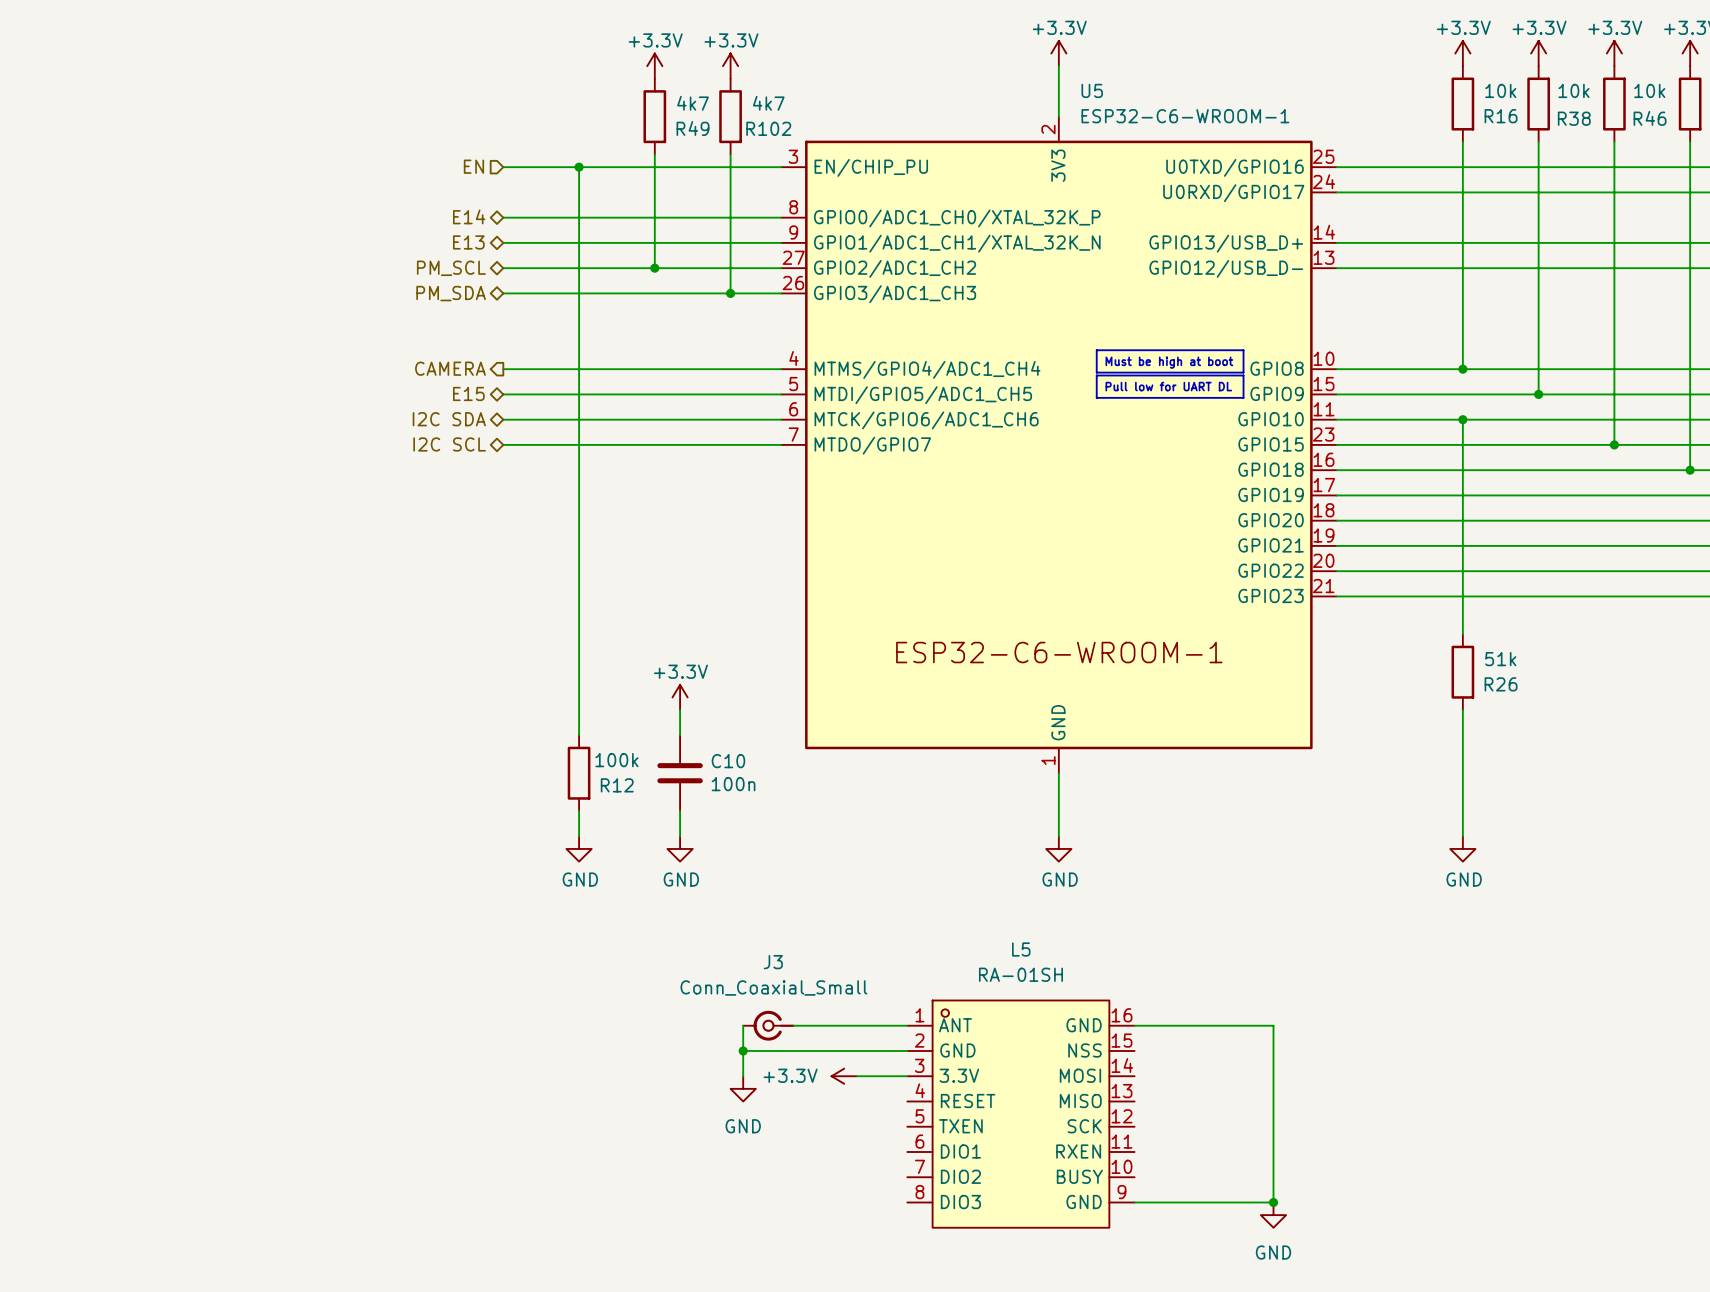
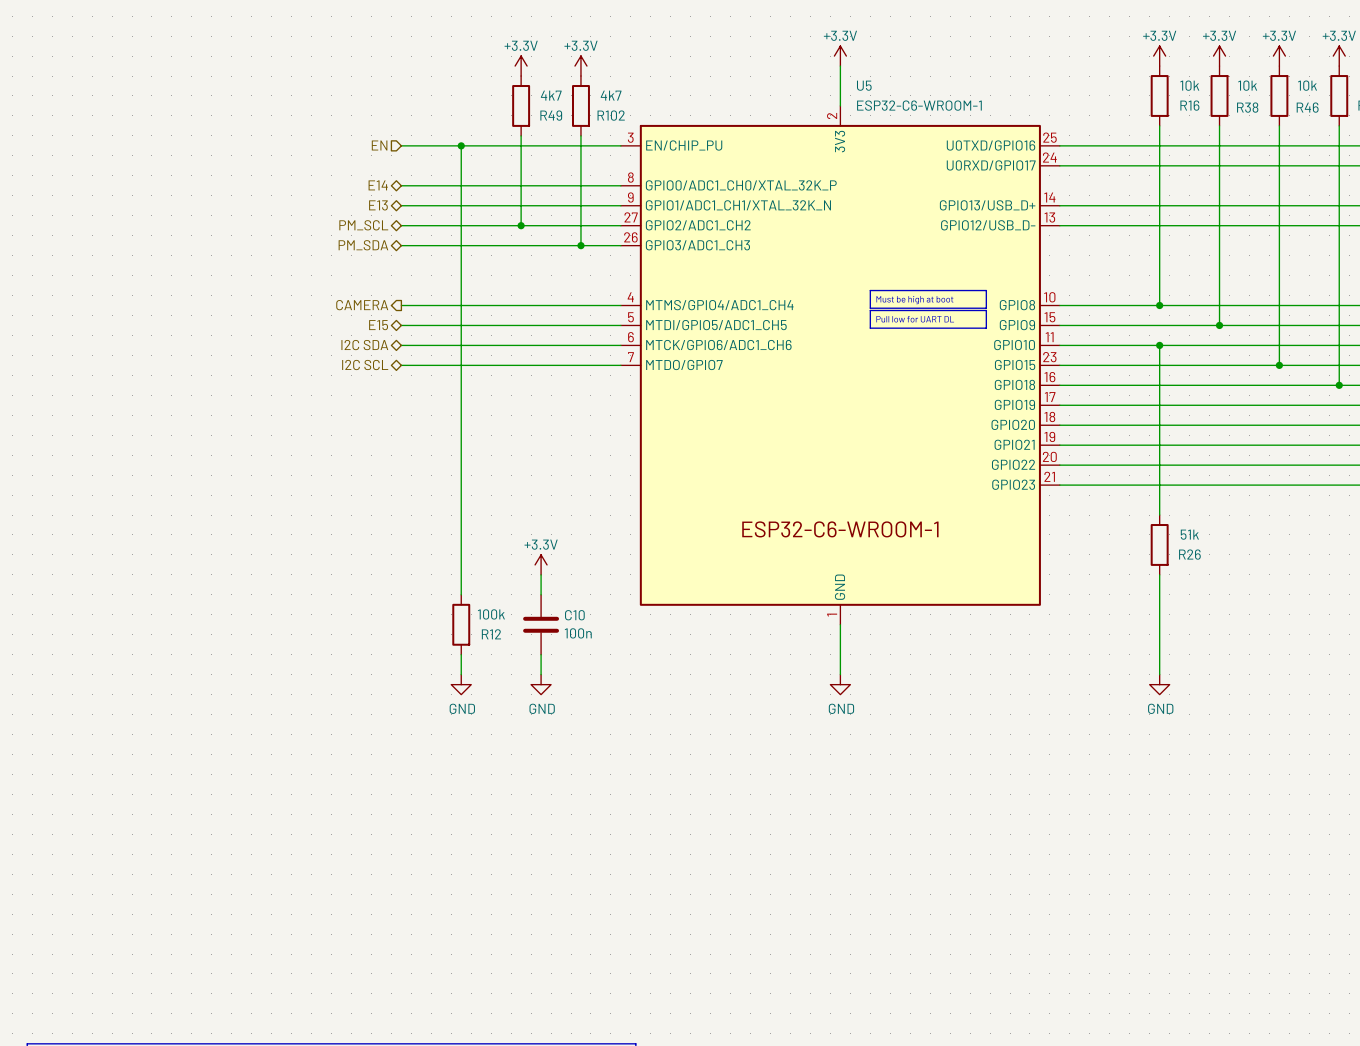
wire: (743, 1025) (743, 1076) -> none
J3: Conn_Coaxial_Small (768, 1025) -> none
wire: (793, 1025) (907, 1025) -> none
wire: (1134, 1025) (1273, 1025) (1273, 1202) (1134, 1202) -> none
wire: (743, 1050) (907, 1050) -> none
junction: (743, 1050) -> none
power symbol: +3.3V (844, 1076) -> none
wire: (856, 1076) (907, 1076) -> none
power symbol: GND (743, 1088) -> none
L5: RA-01SH (1020, 1114) -> none
junction: (1273, 1202) -> none
power symbol: GND (1273, 1215) -> none

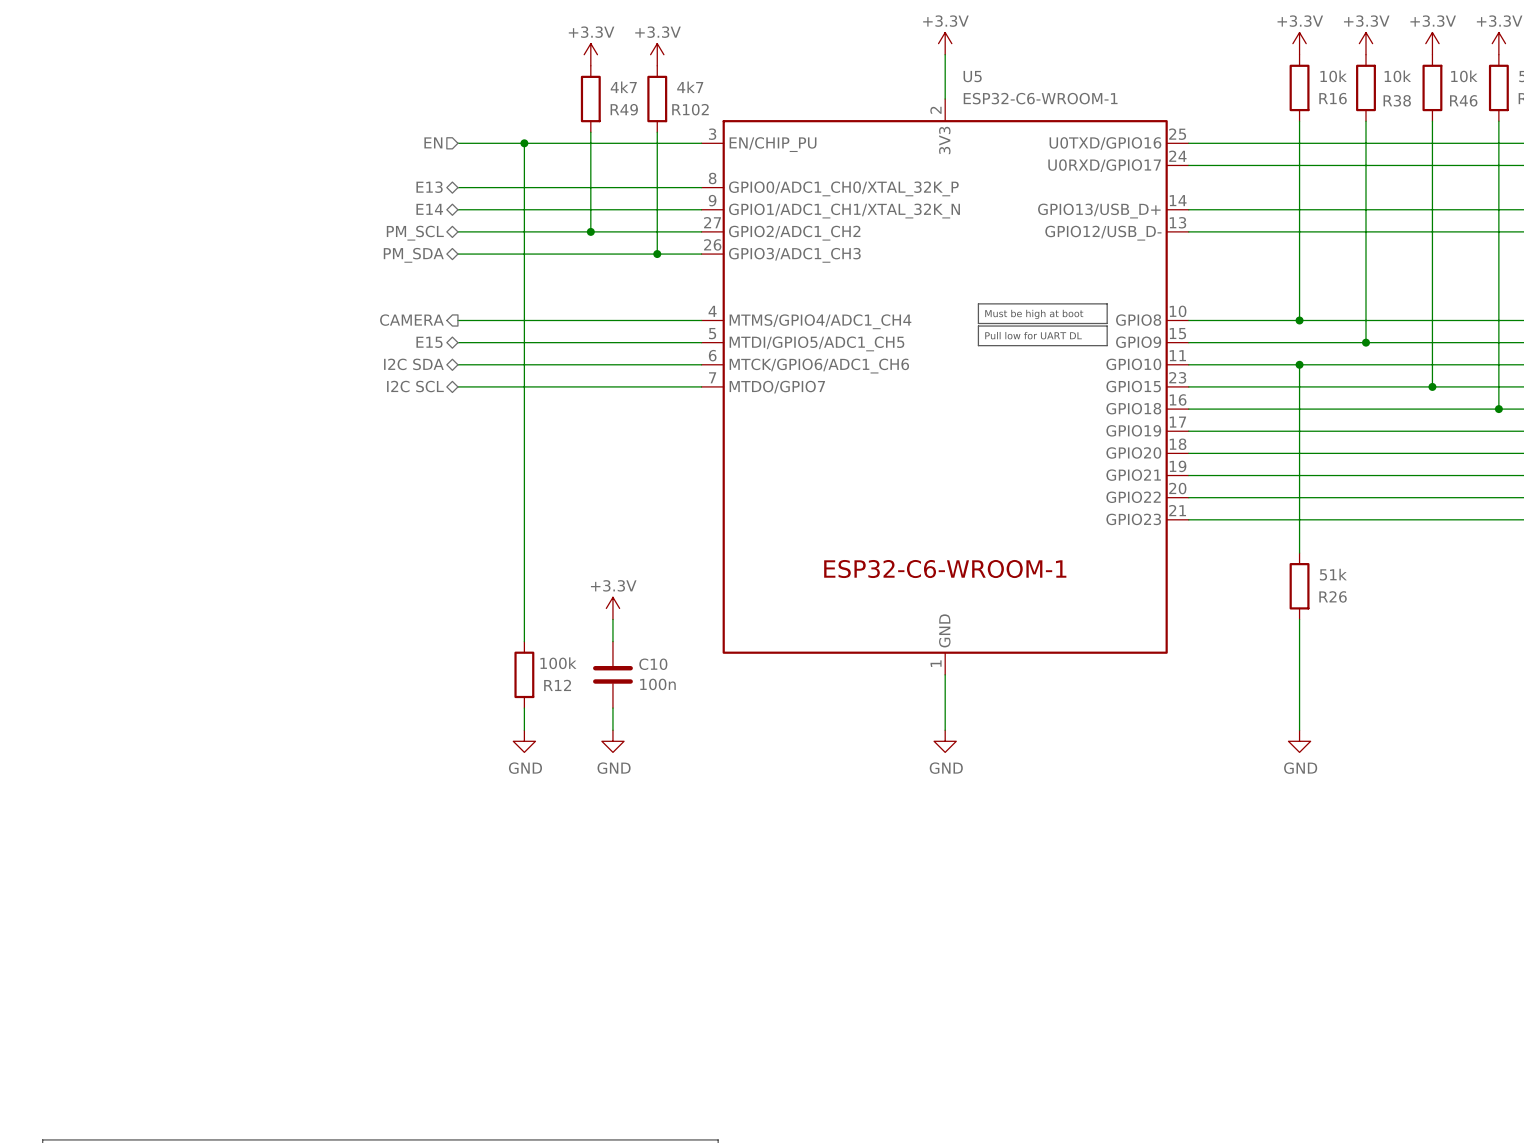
hierarchical label: E14 (378, 185) -> E13 (429, 187)
hierarchical label: E13 (378, 205) -> E14 (429, 209)

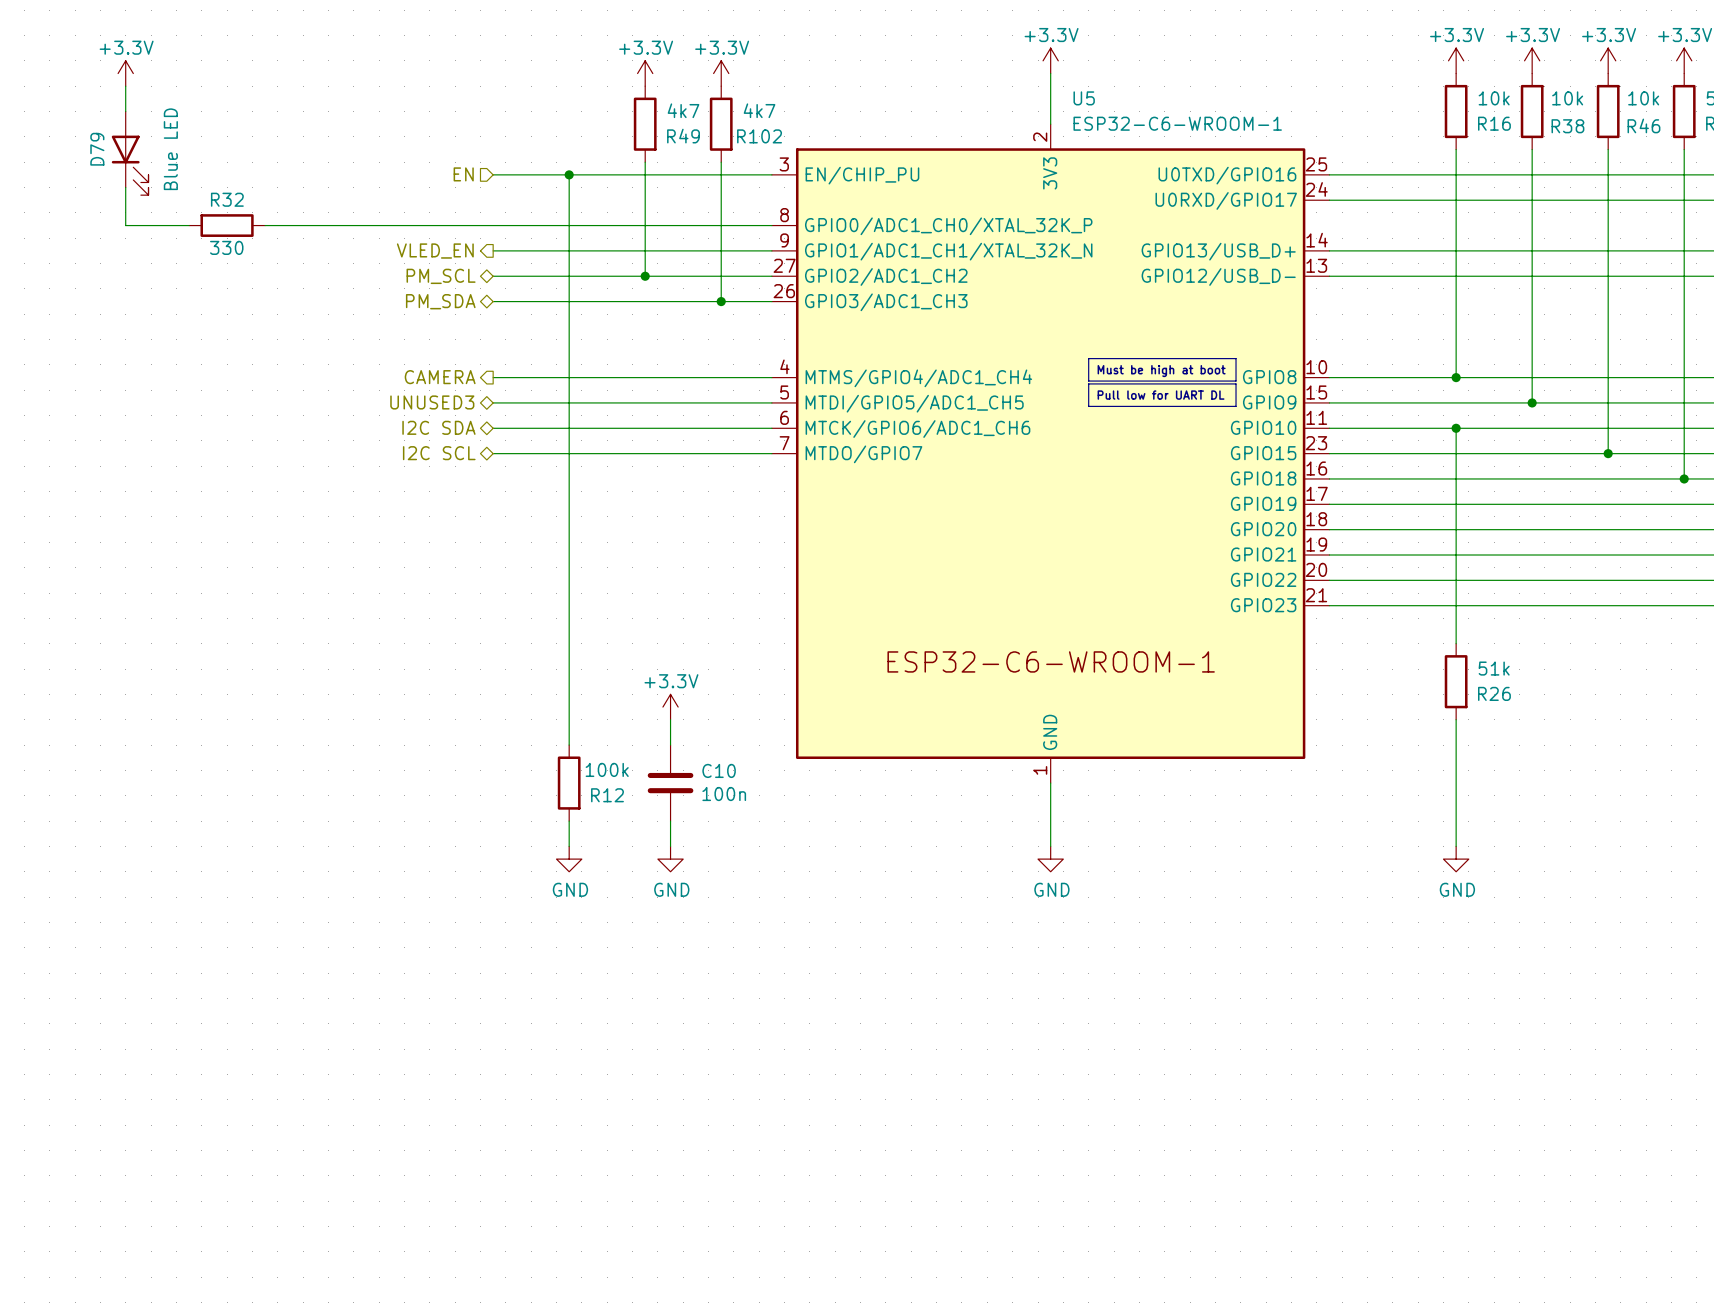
power symbol: none -> +3.3V (125, 73)
wire: none -> (125, 86) (125, 111)
D79: none -> Blue LED (130, 153)
wire: none -> (125, 187) (125, 225) (189, 225)
R32: none -> 330 (227, 225)
wire: none -> (265, 225) (493, 225)
hierarchical label: E13 (429, 187) -> none
hierarchical label shape: bidirectional (429, 209) -> output (435, 251)
hierarchical label: E14 (429, 209) -> VLED_EN (435, 251)
hierarchical label: E15 (429, 342) -> UNUSED3 (432, 402)

